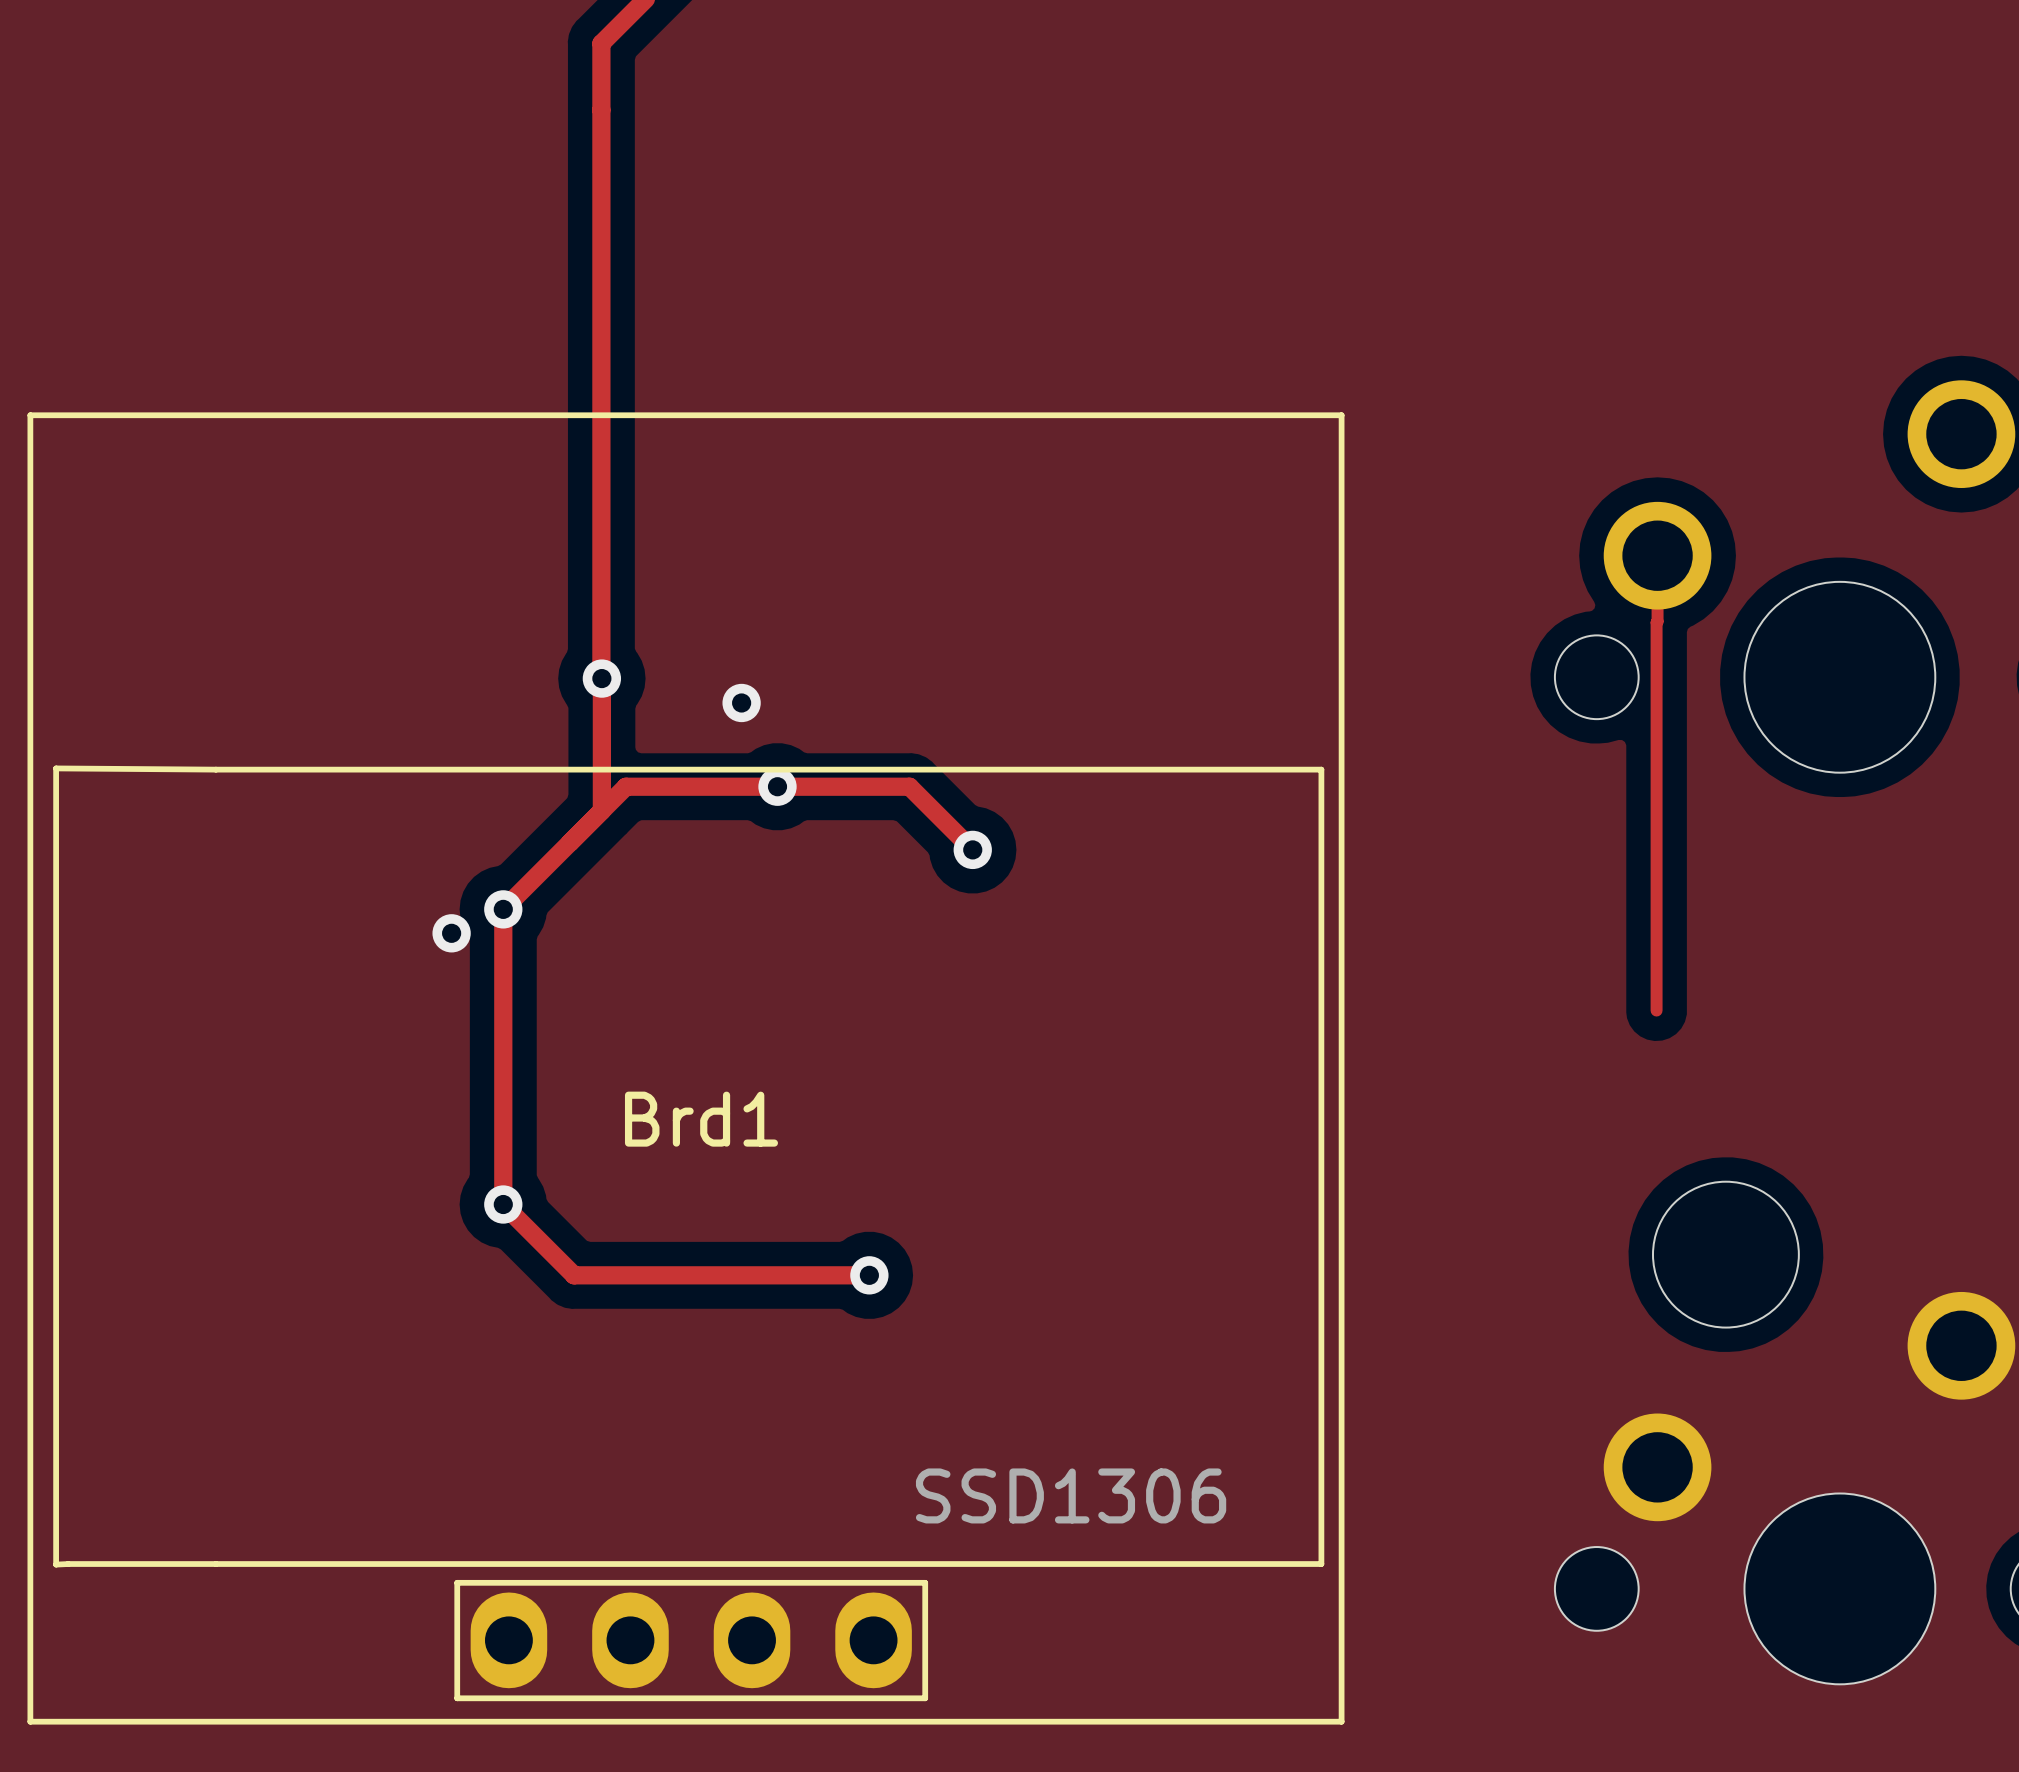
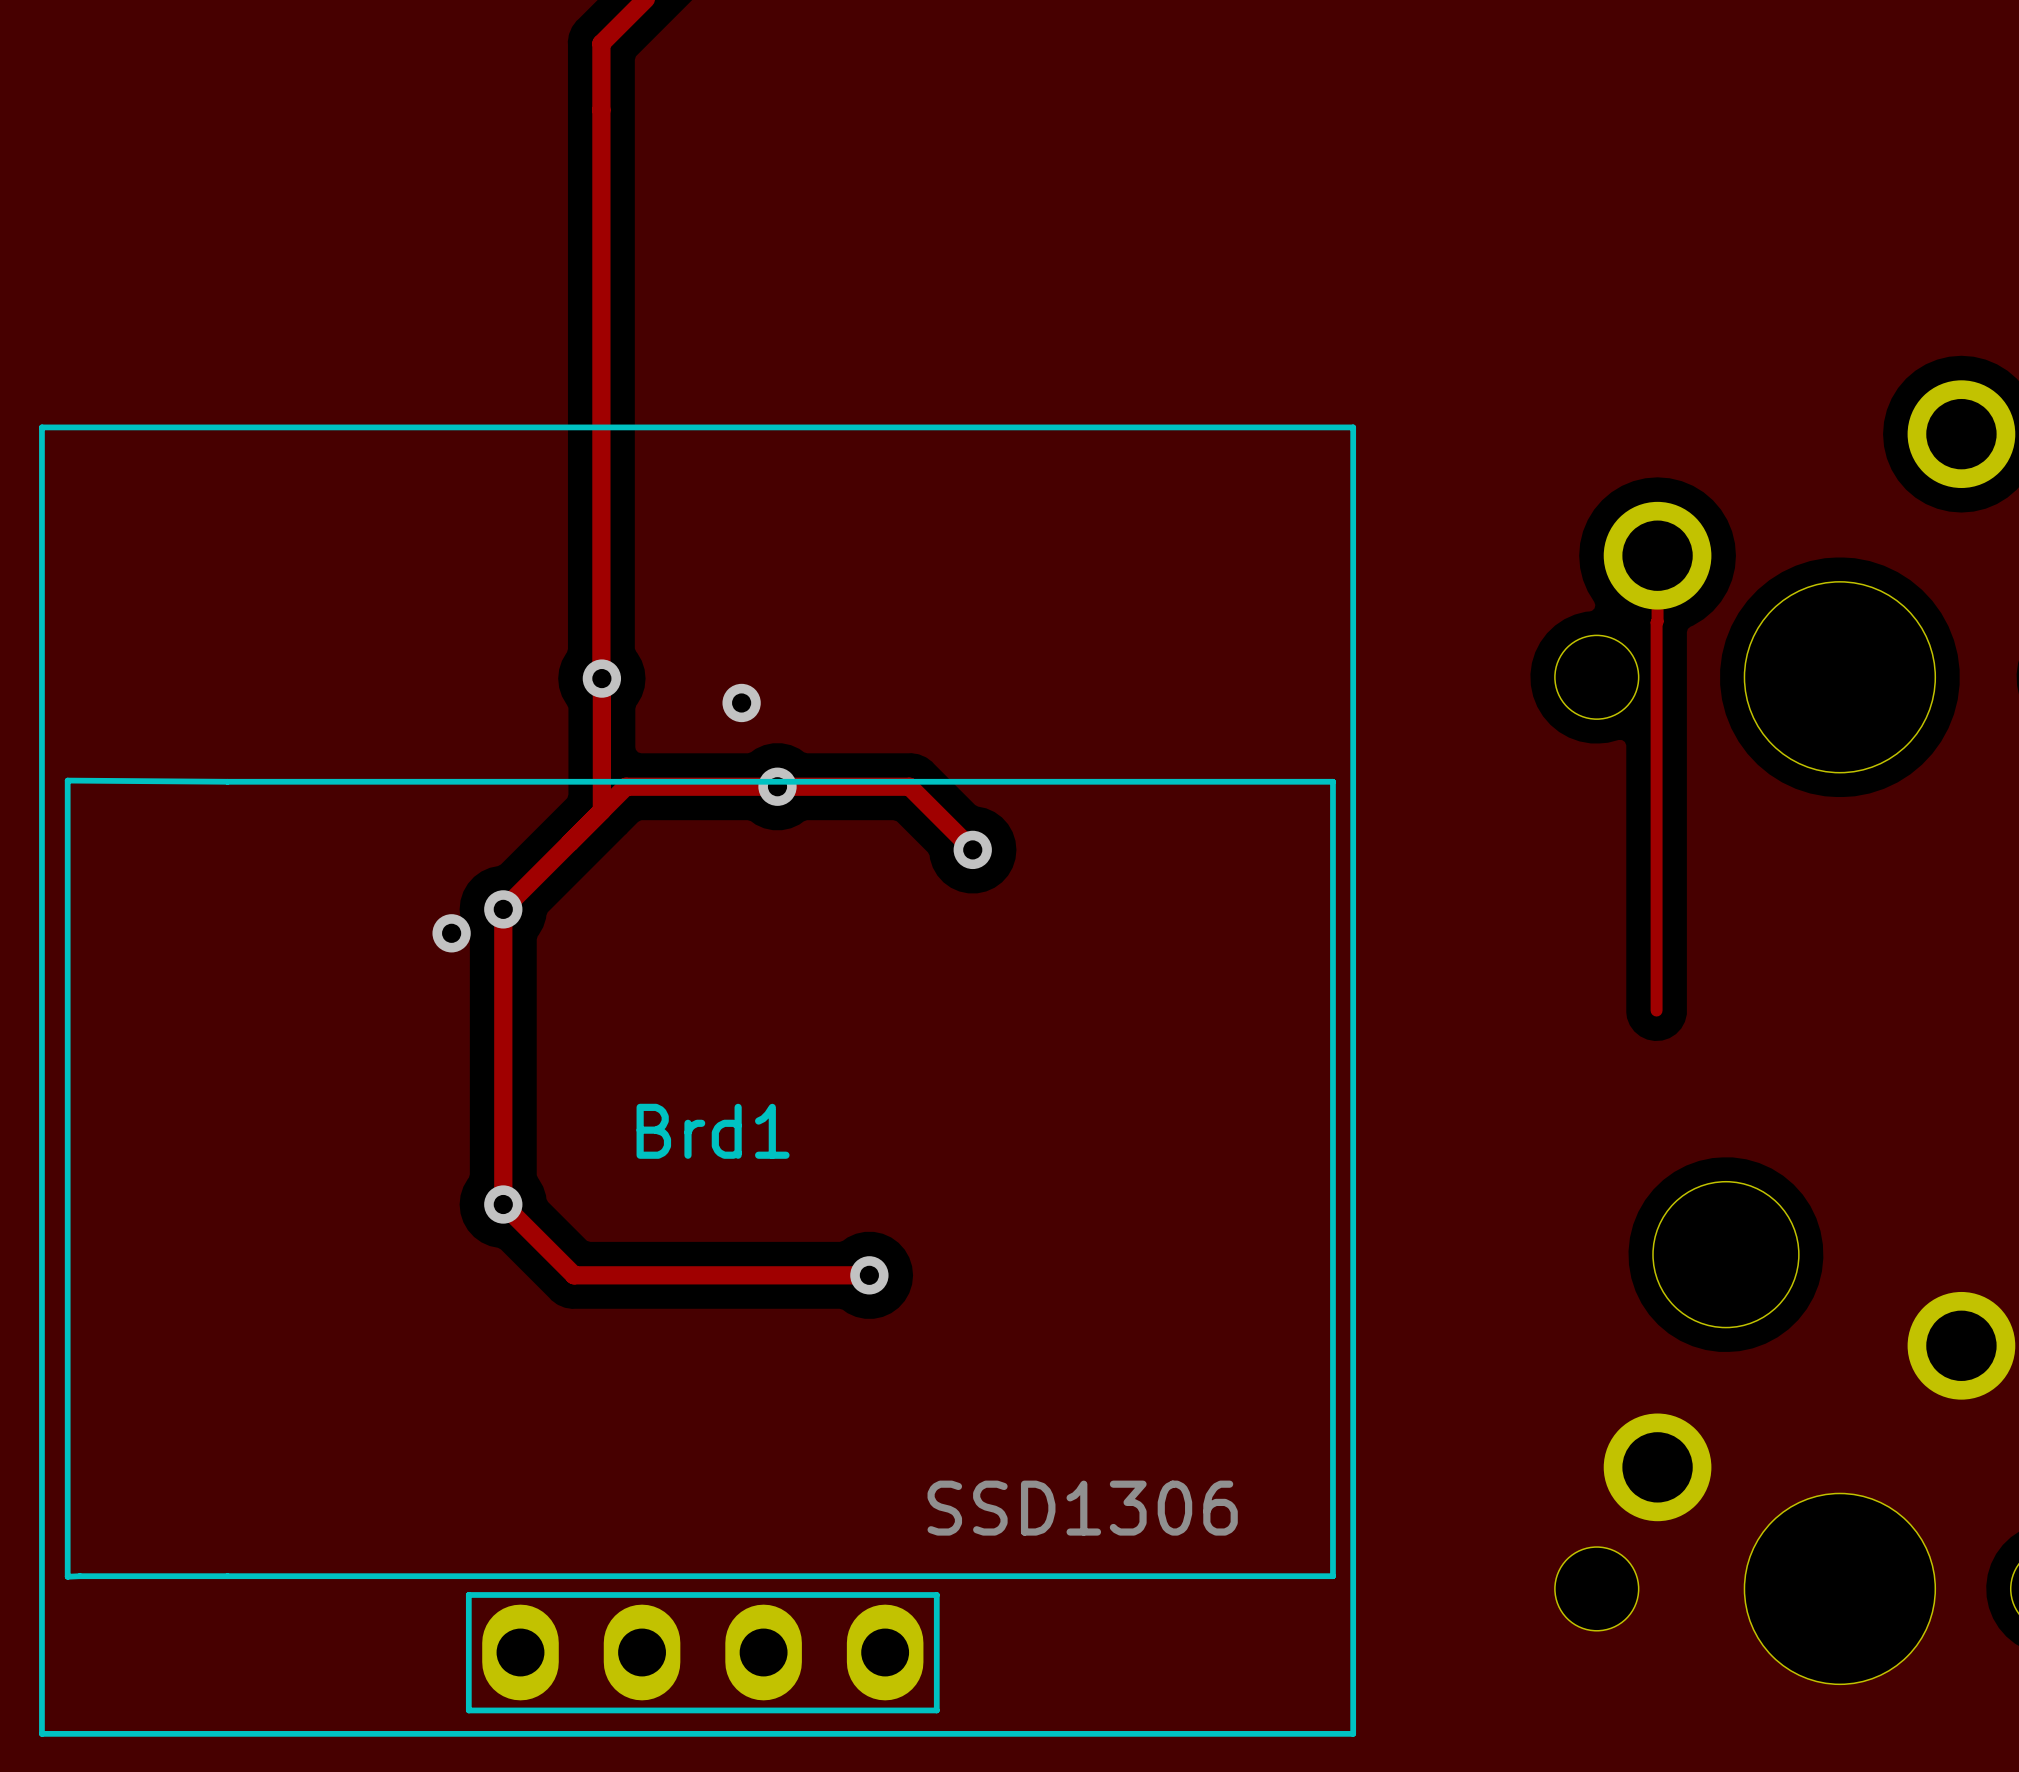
Brd1 position: (685, 1068) -> (697, 1080)

